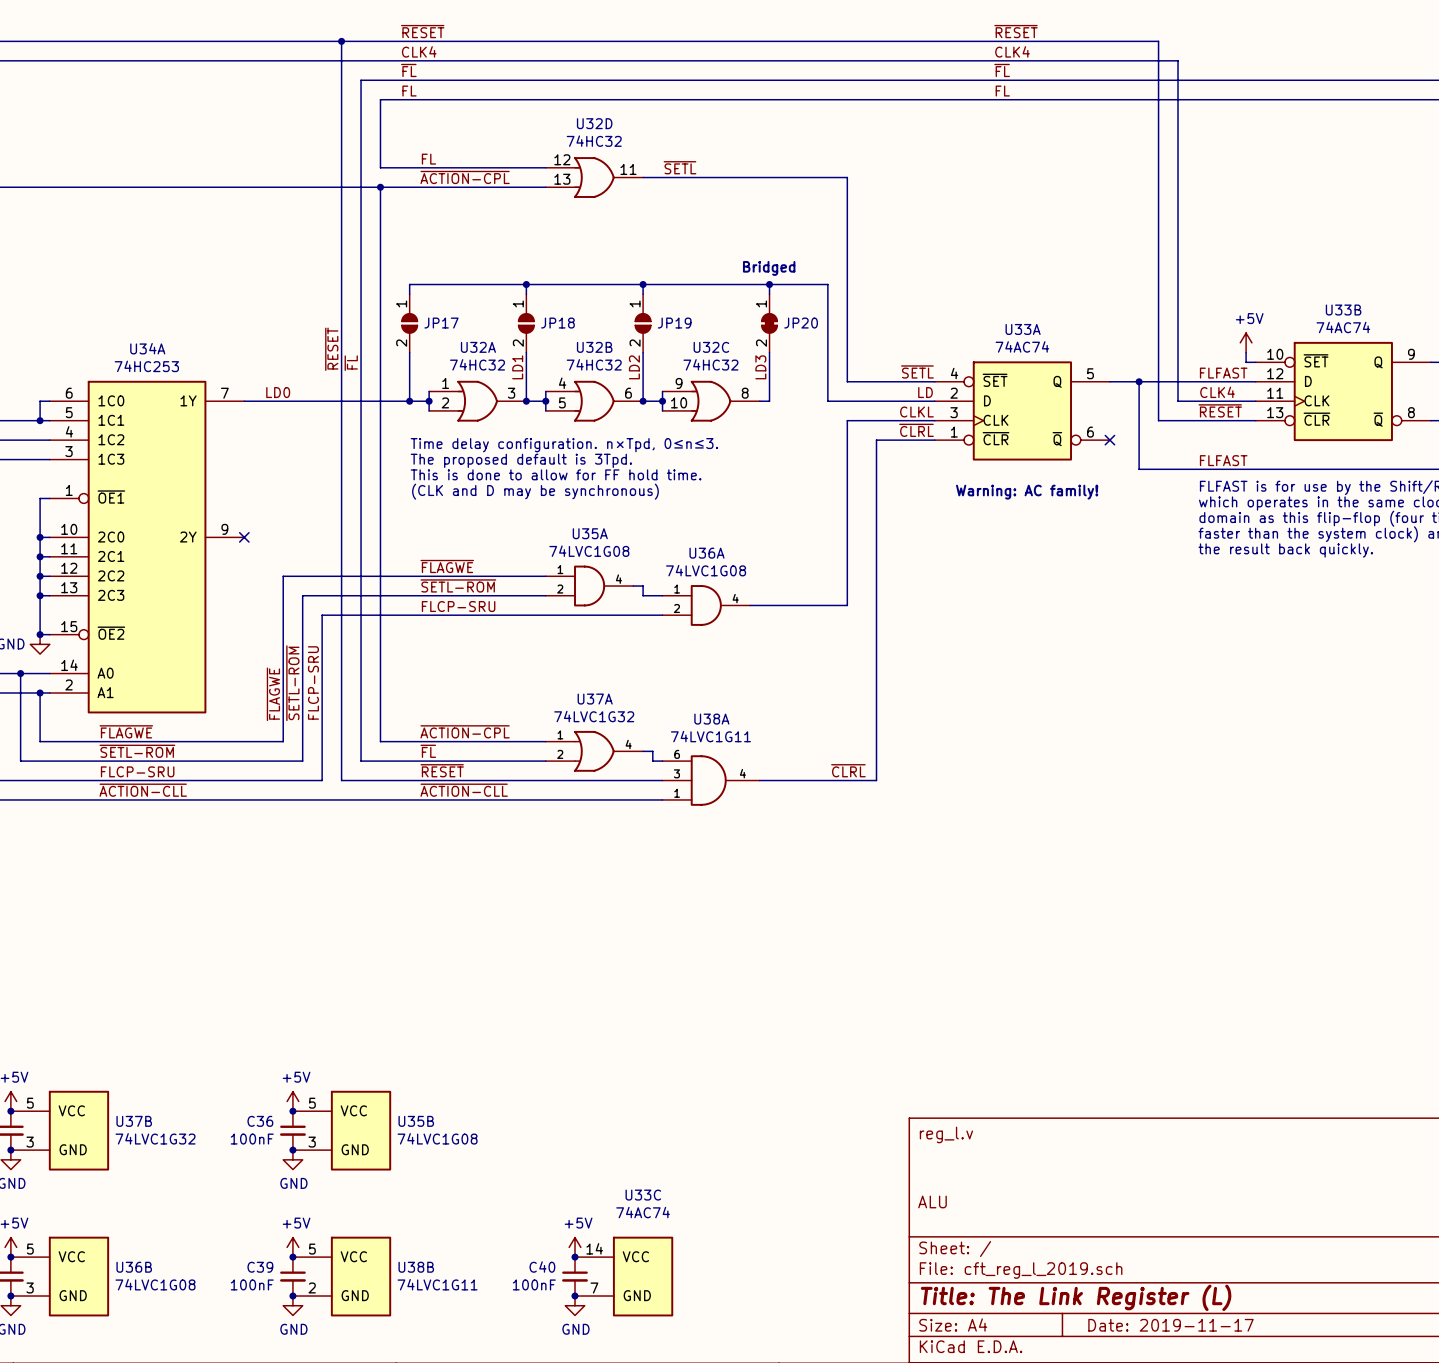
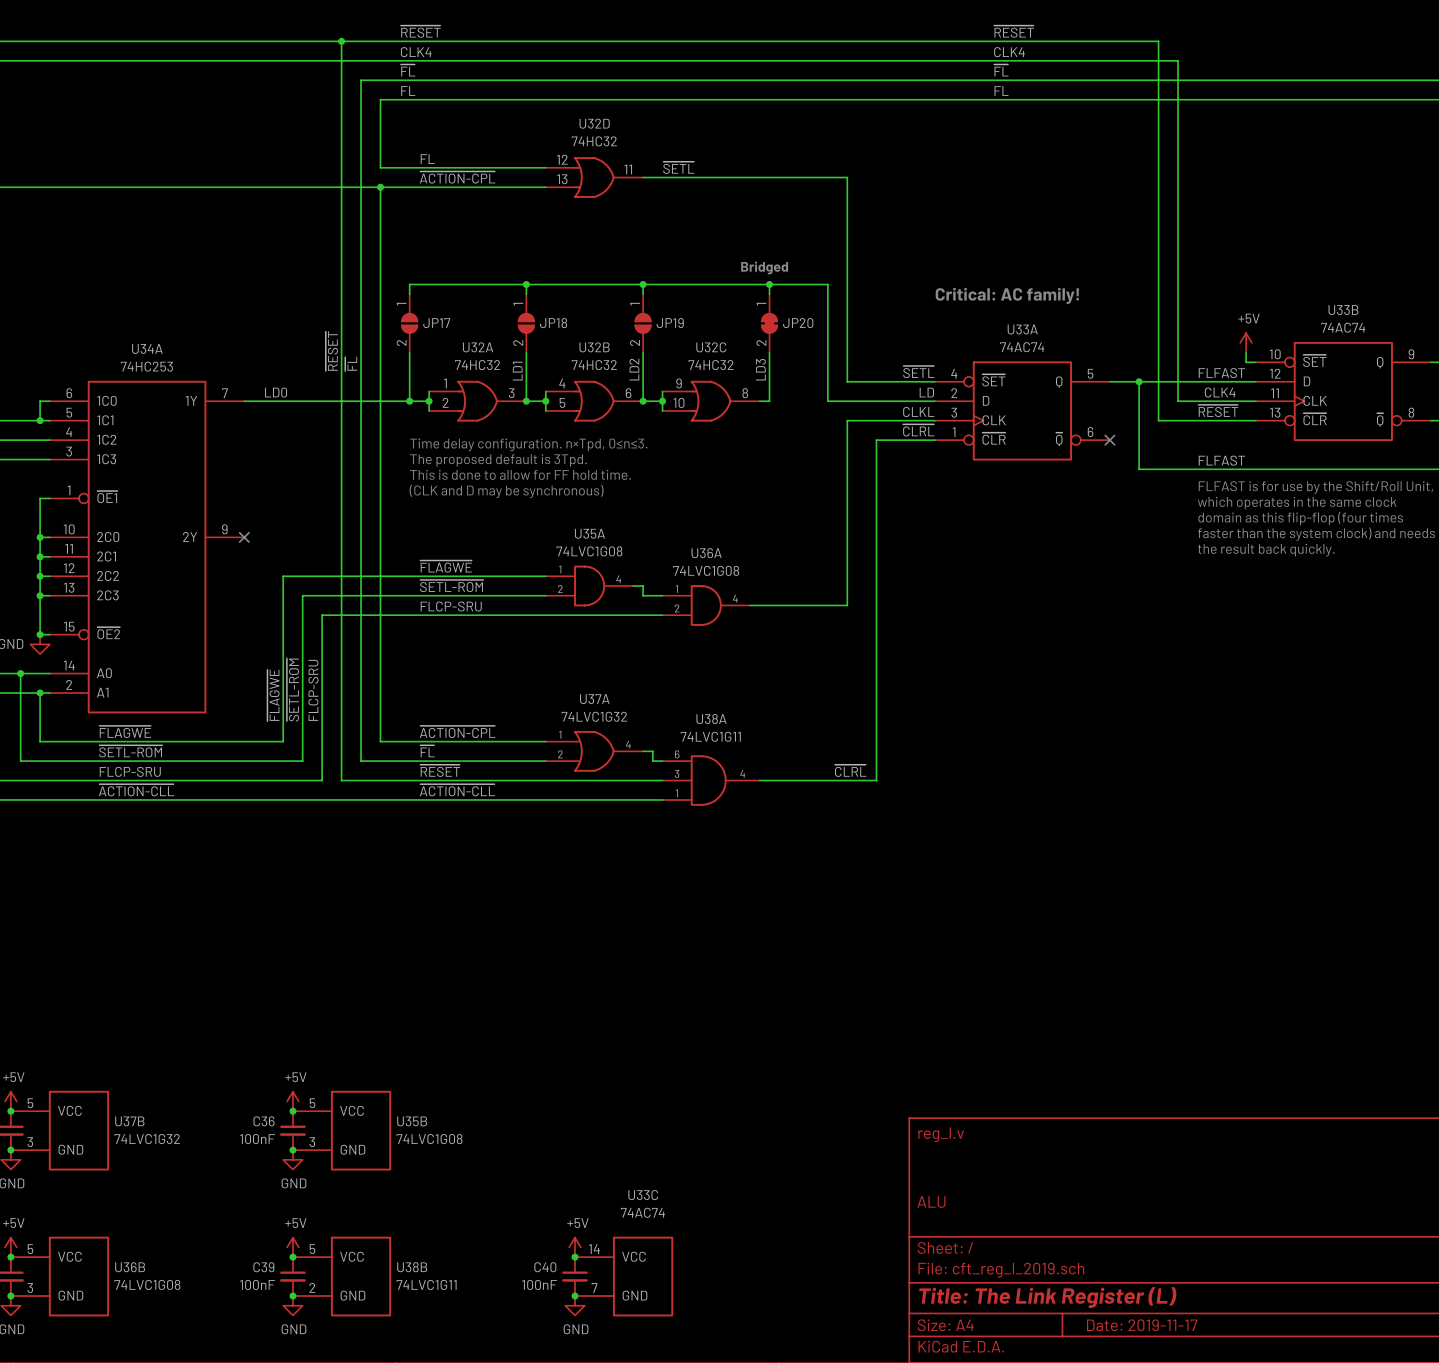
text: none -> Critical: AC family! (1007, 295)
text: Warning: AC family! (1027, 492) -> none

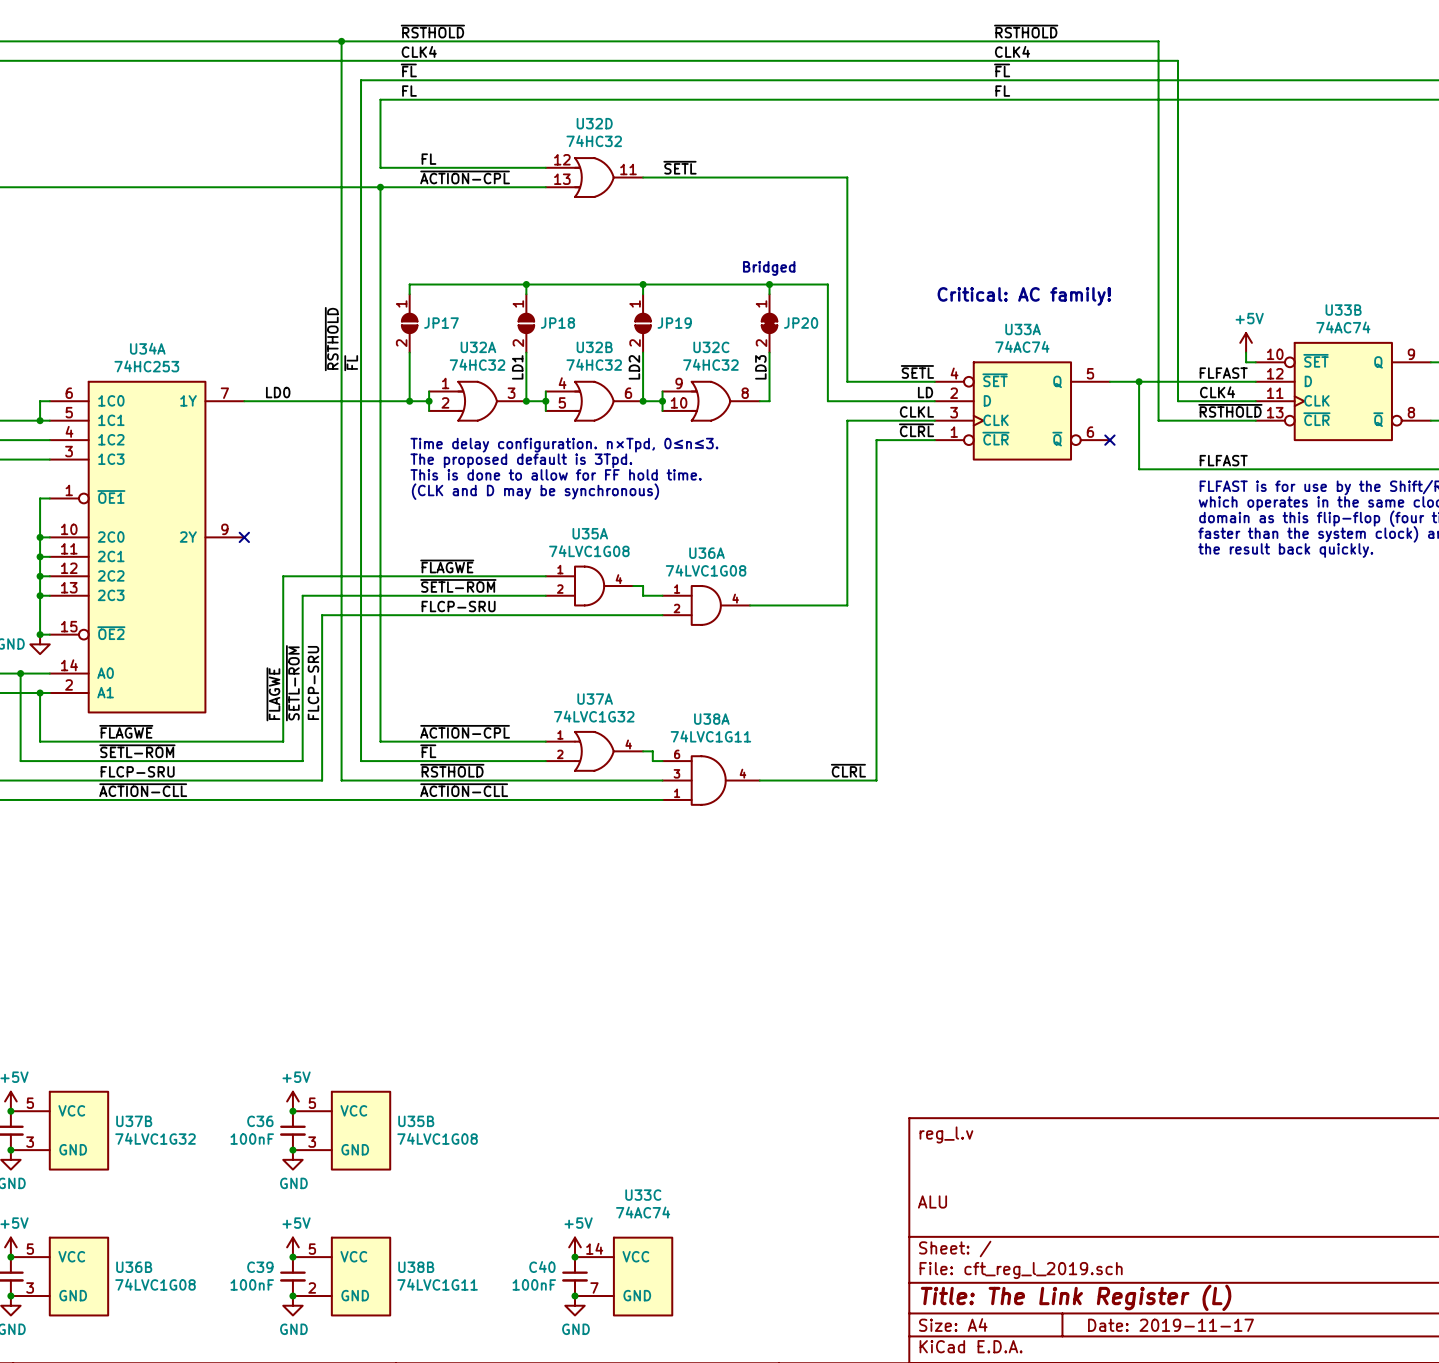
label: ~{RESET} (420, 31) -> ~{RSTHOLD} (432, 31)
label: ~{RESET} (1014, 31) -> ~{RSTHOLD} (1026, 31)
label: ~{RESET} (331, 351) -> ~{RSTHOLD} (331, 339)
label: ~{RESET} (1218, 410) -> ~{RSTHOLD} (1230, 410)
label: ~{RESET} (440, 770) -> ~{RSTHOLD} (452, 770)

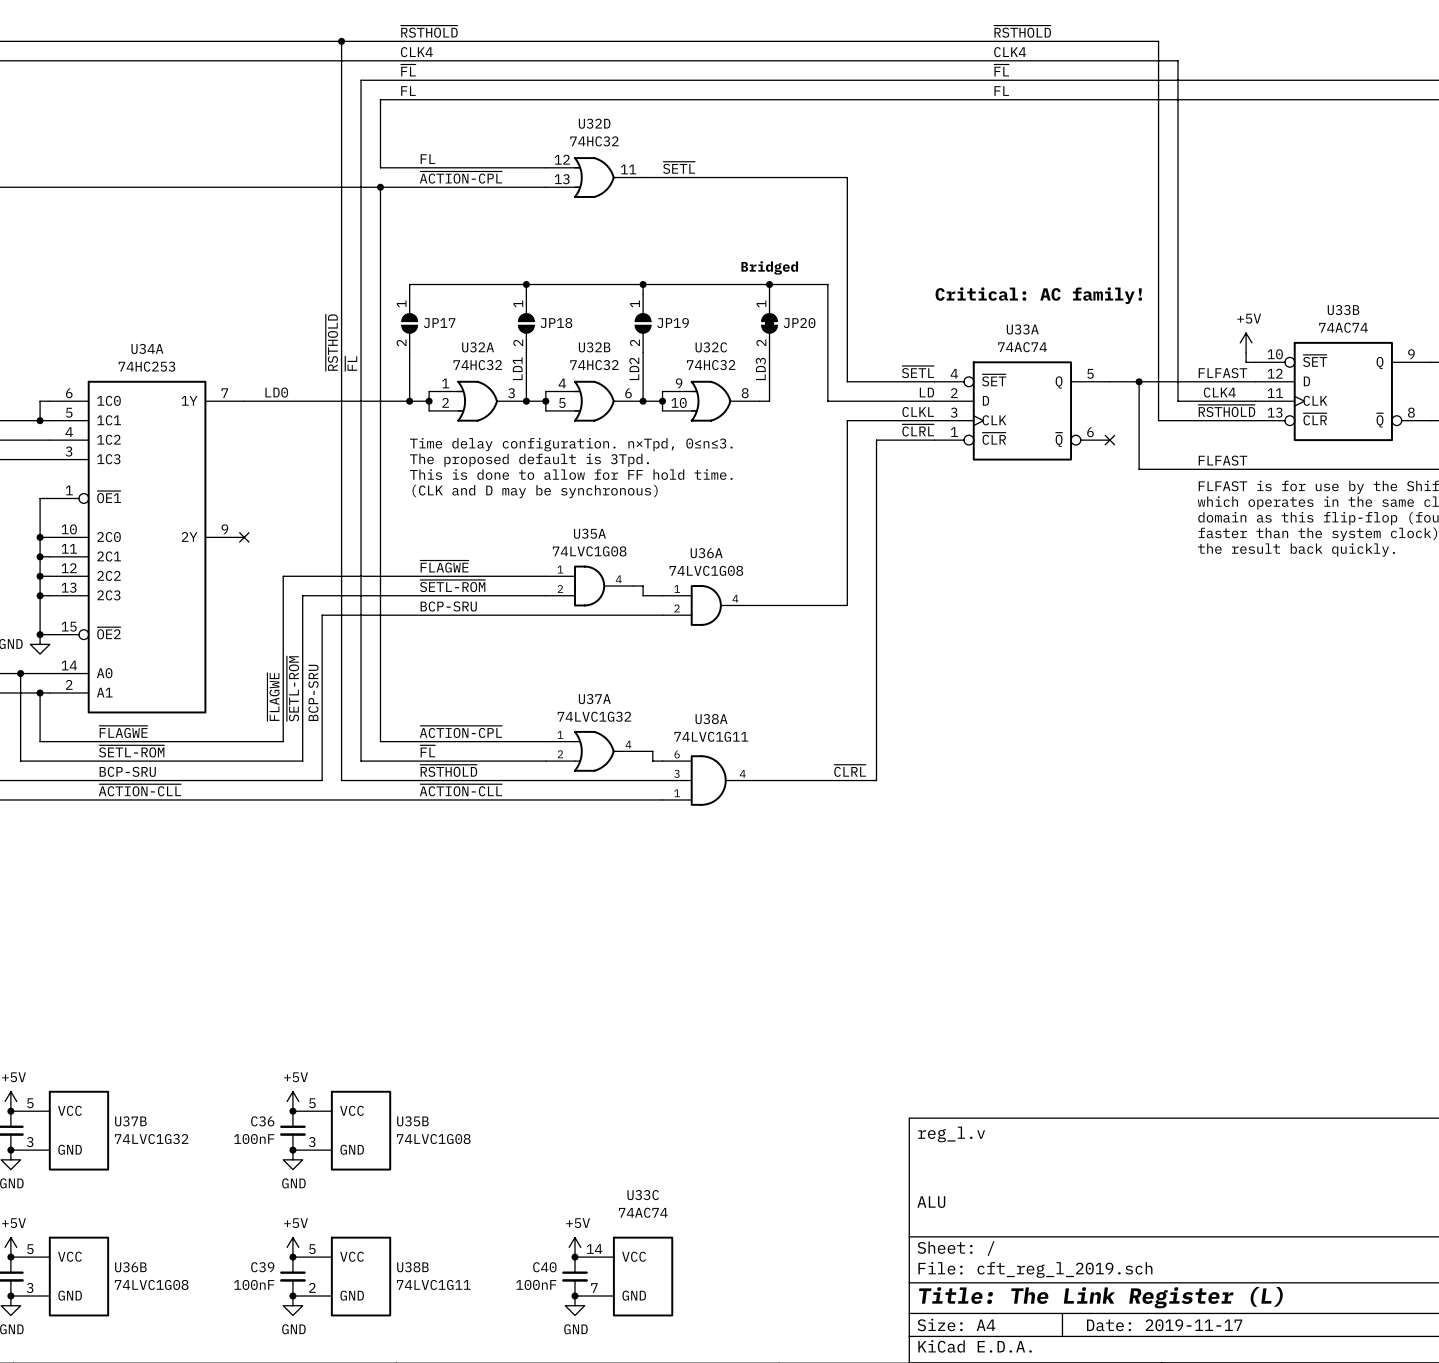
label: FLCP-SRU (458, 606) -> BCP-SRU (448, 606)
label: FLCP-SRU (313, 682) -> BCP-SRU (313, 692)
label: FLCP-SRU (137, 771) -> BCP-SRU (127, 771)

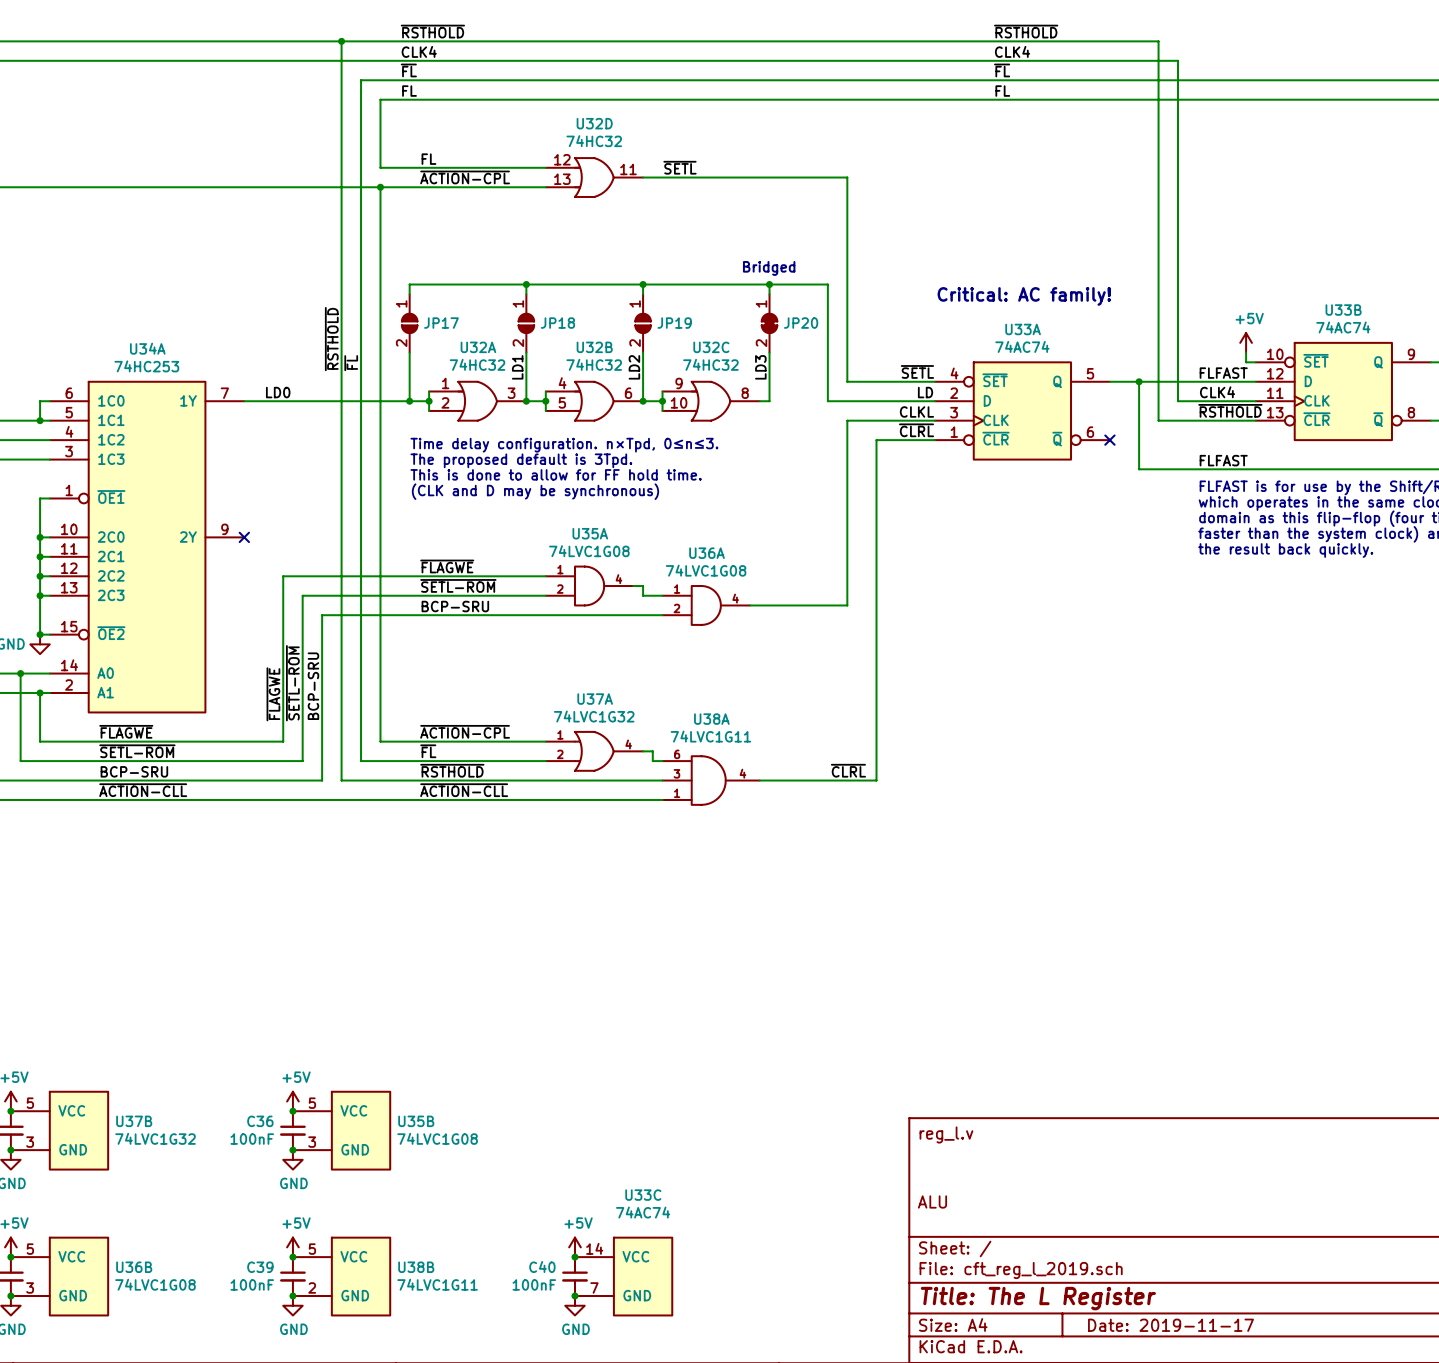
title block: Title: The Link Register (L) (1100, 1297) -> Title: The L Register (1038, 1298)

